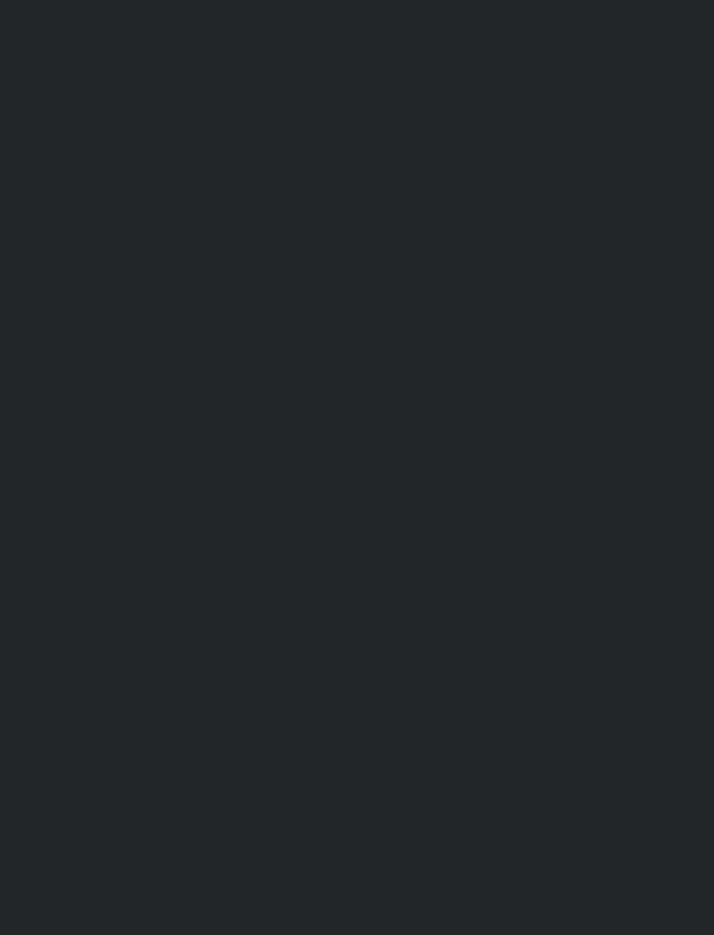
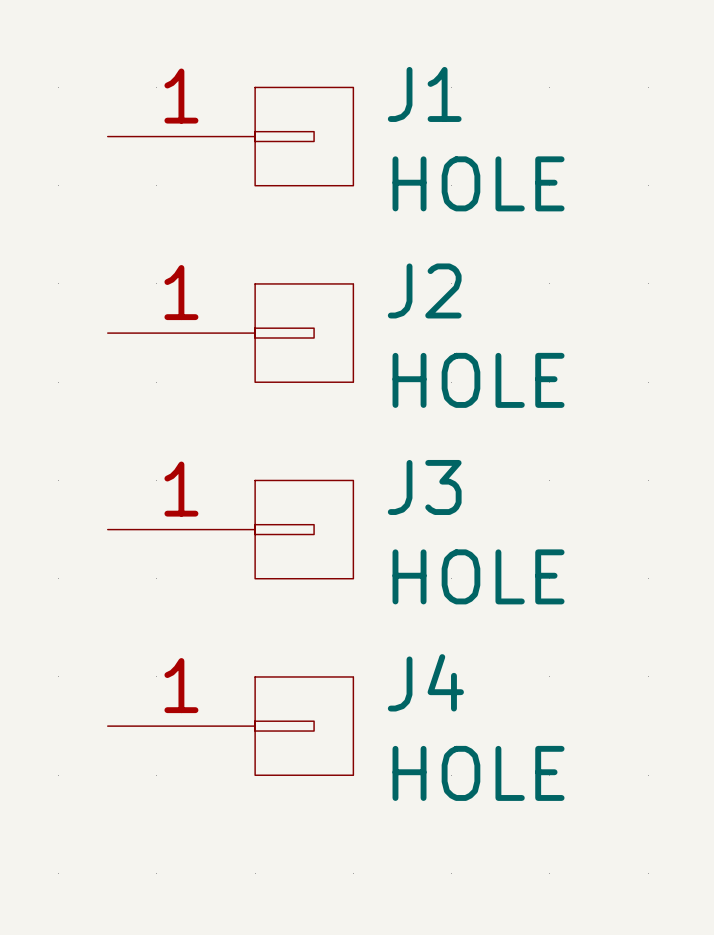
J1: none -> HOLE (230, 136)
J2: none -> HOLE (230, 333)
J3: none -> HOLE (230, 529)
J4: none -> HOLE (230, 726)

